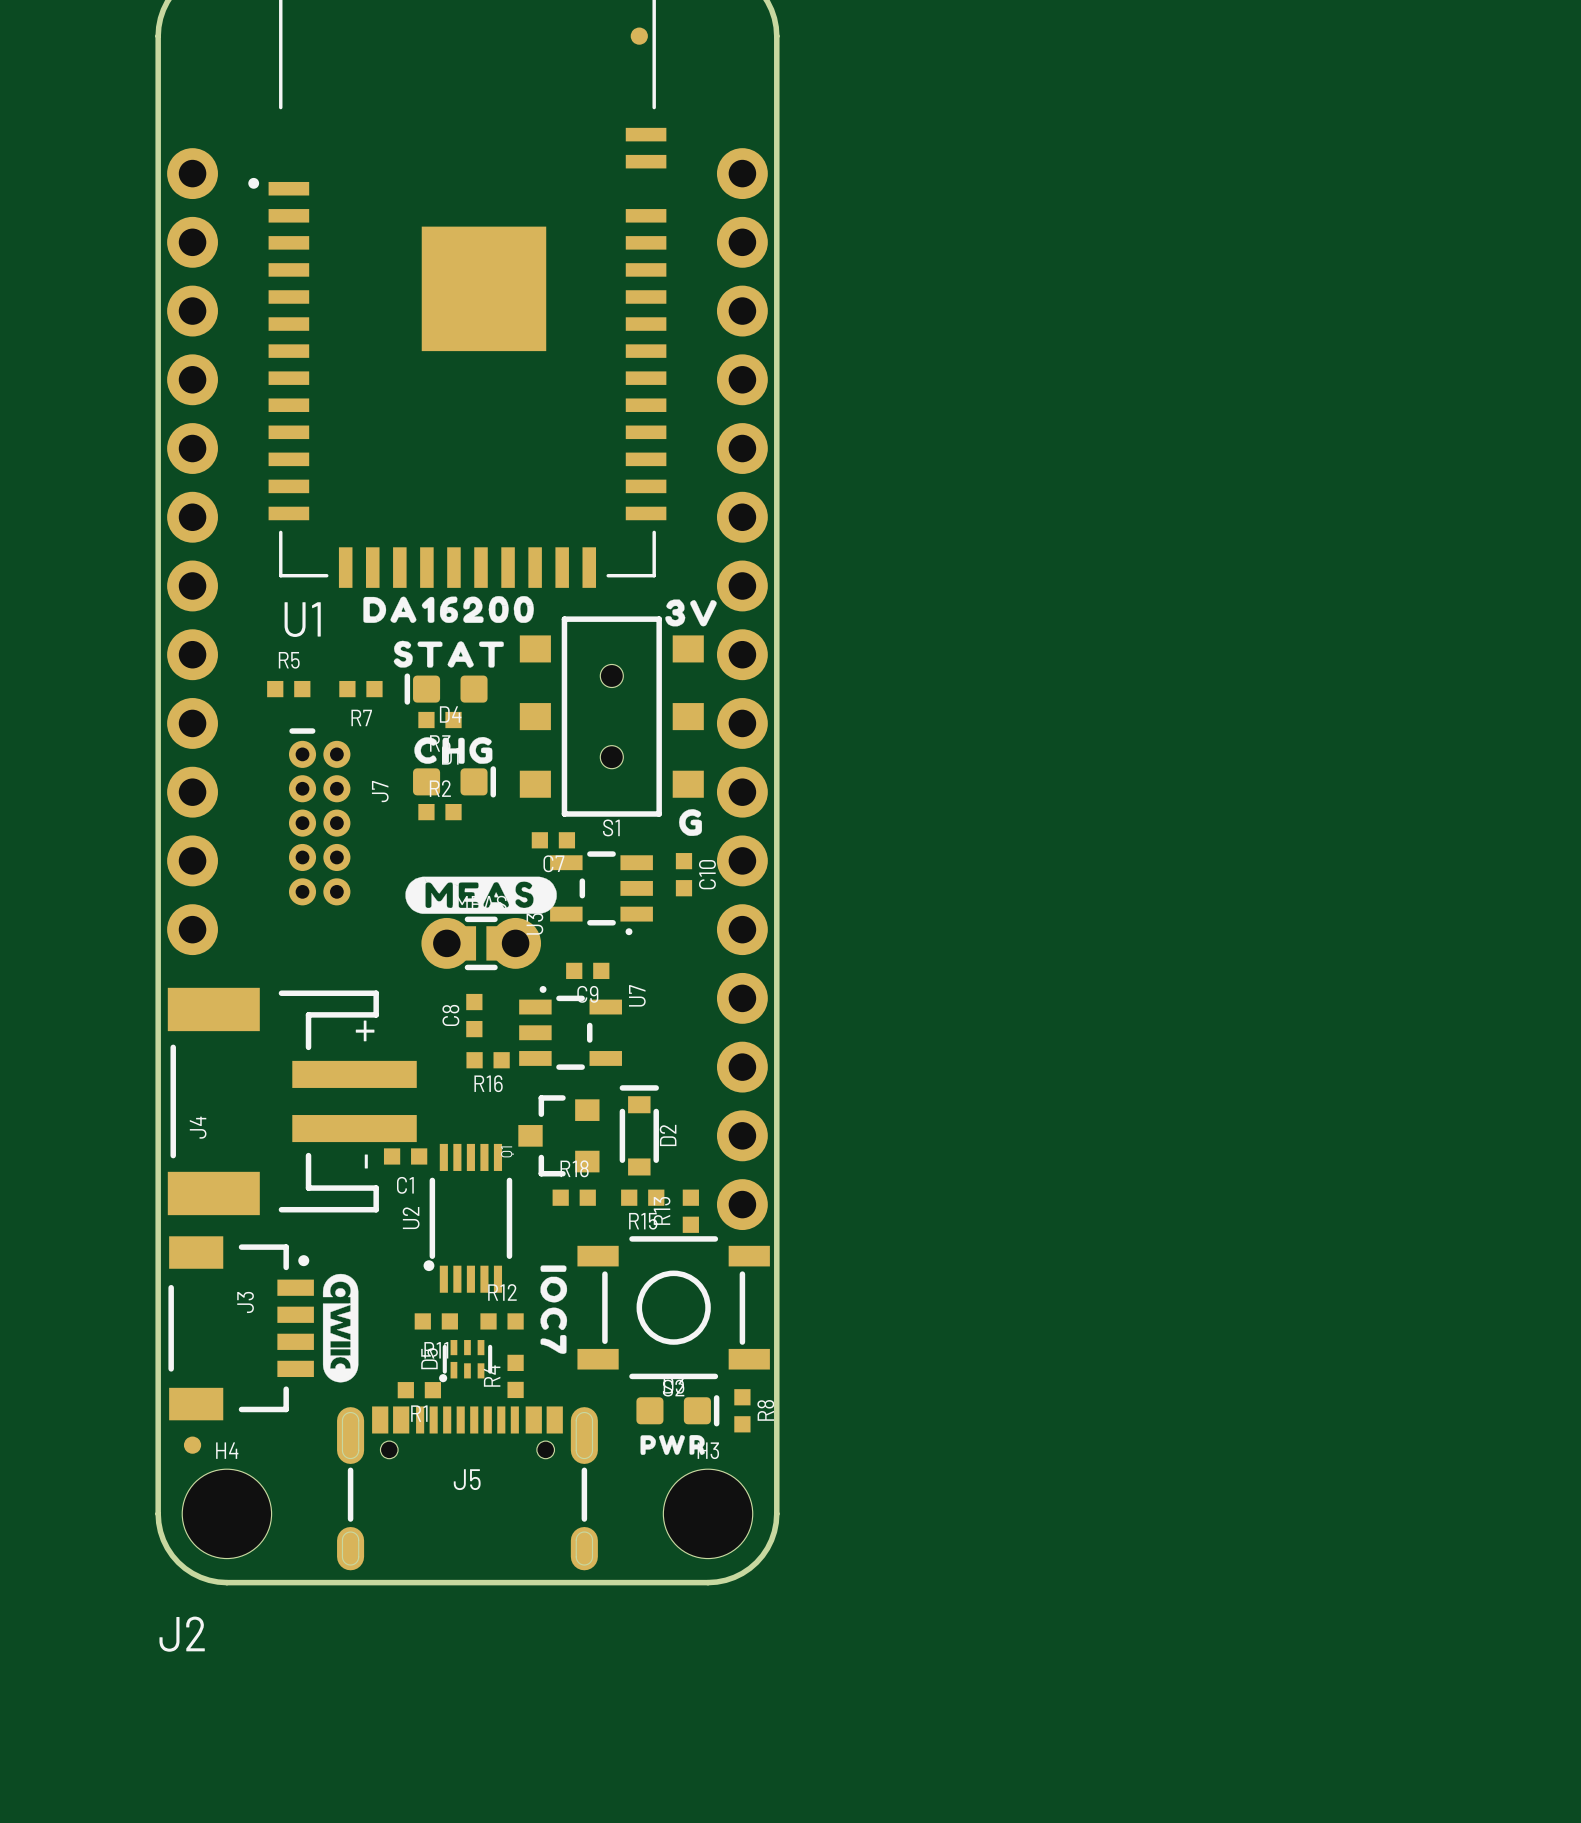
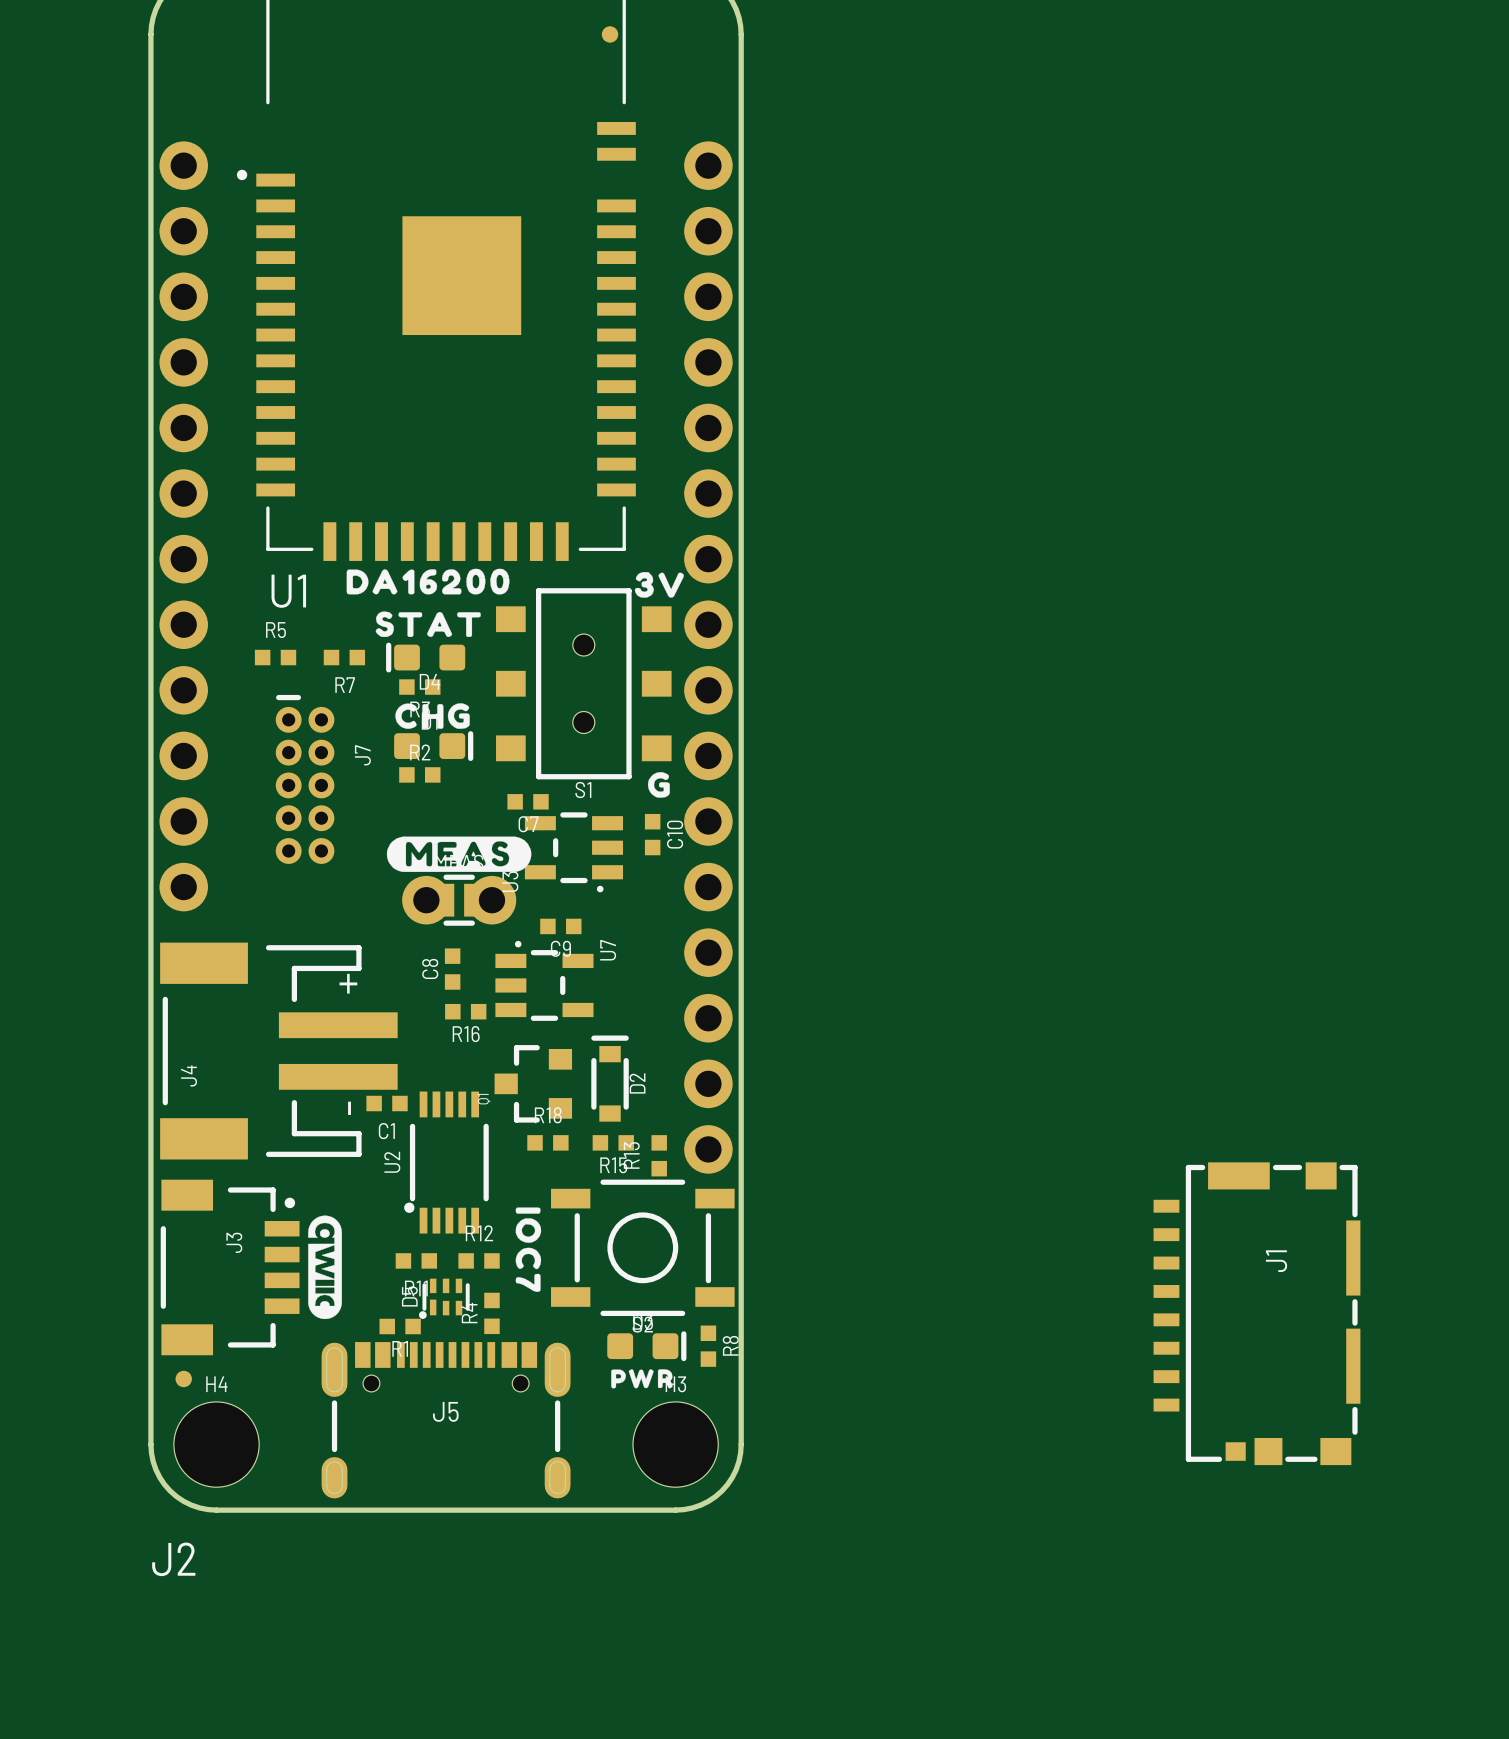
J1: none -> (1256, 1313)

